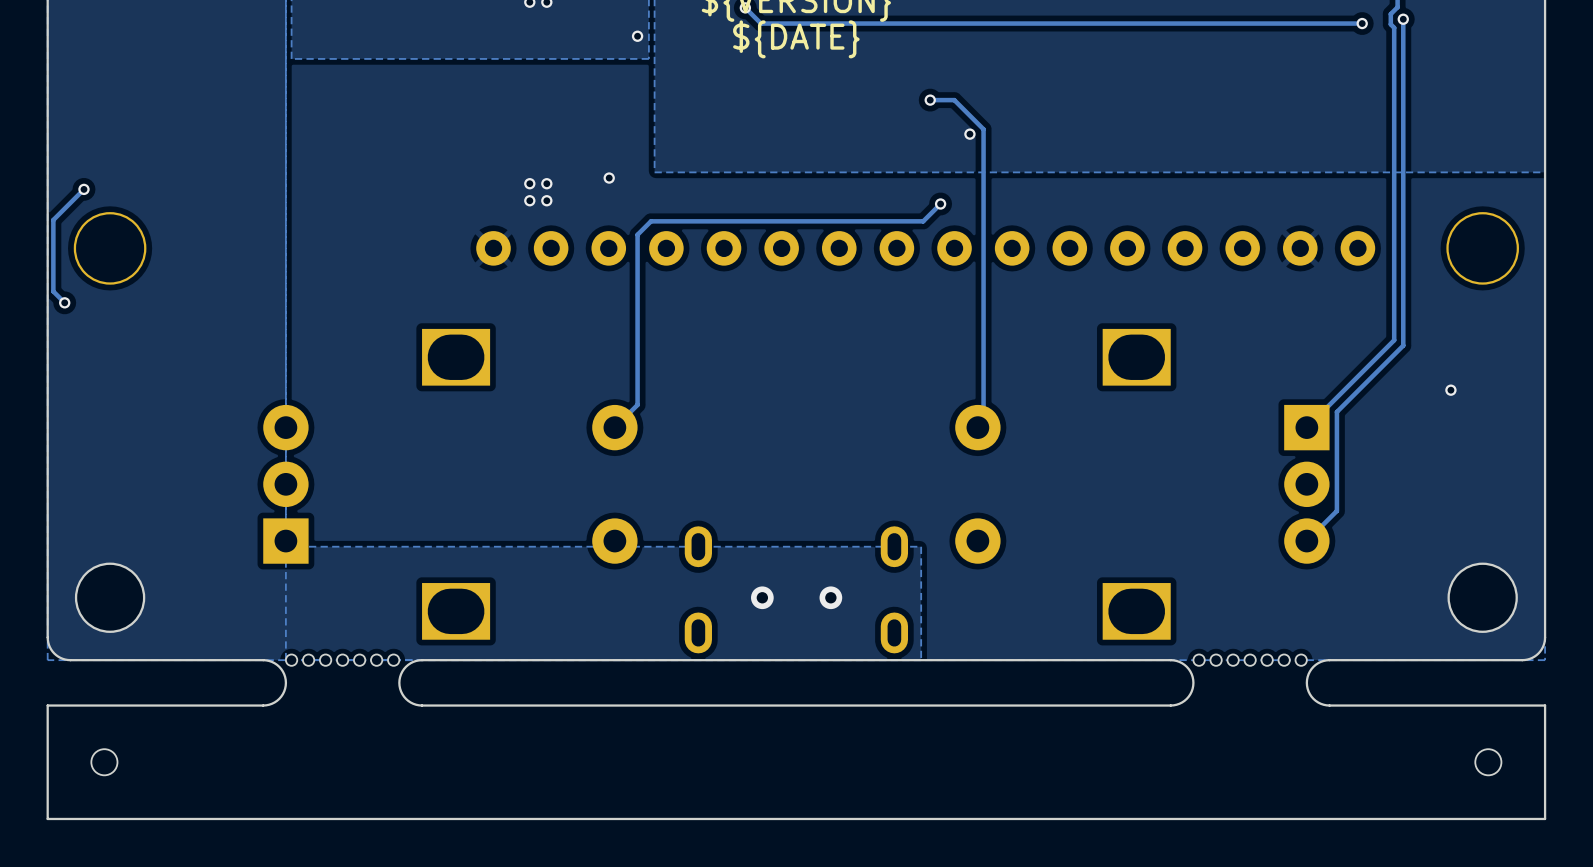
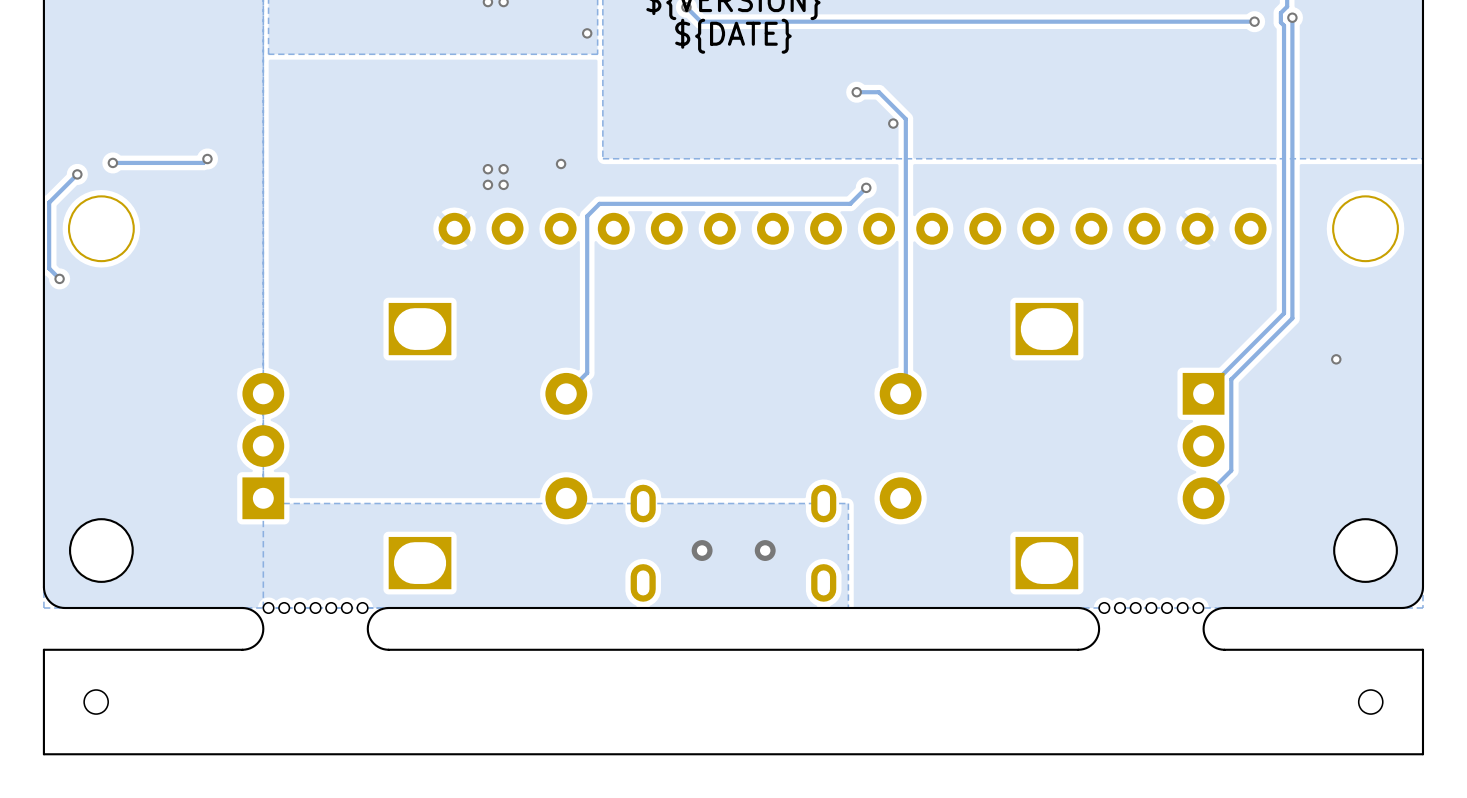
track: none -> (207, 159) (203, 162) (112, 162)
via: none -> (207, 159)
via: none -> (112, 162)

